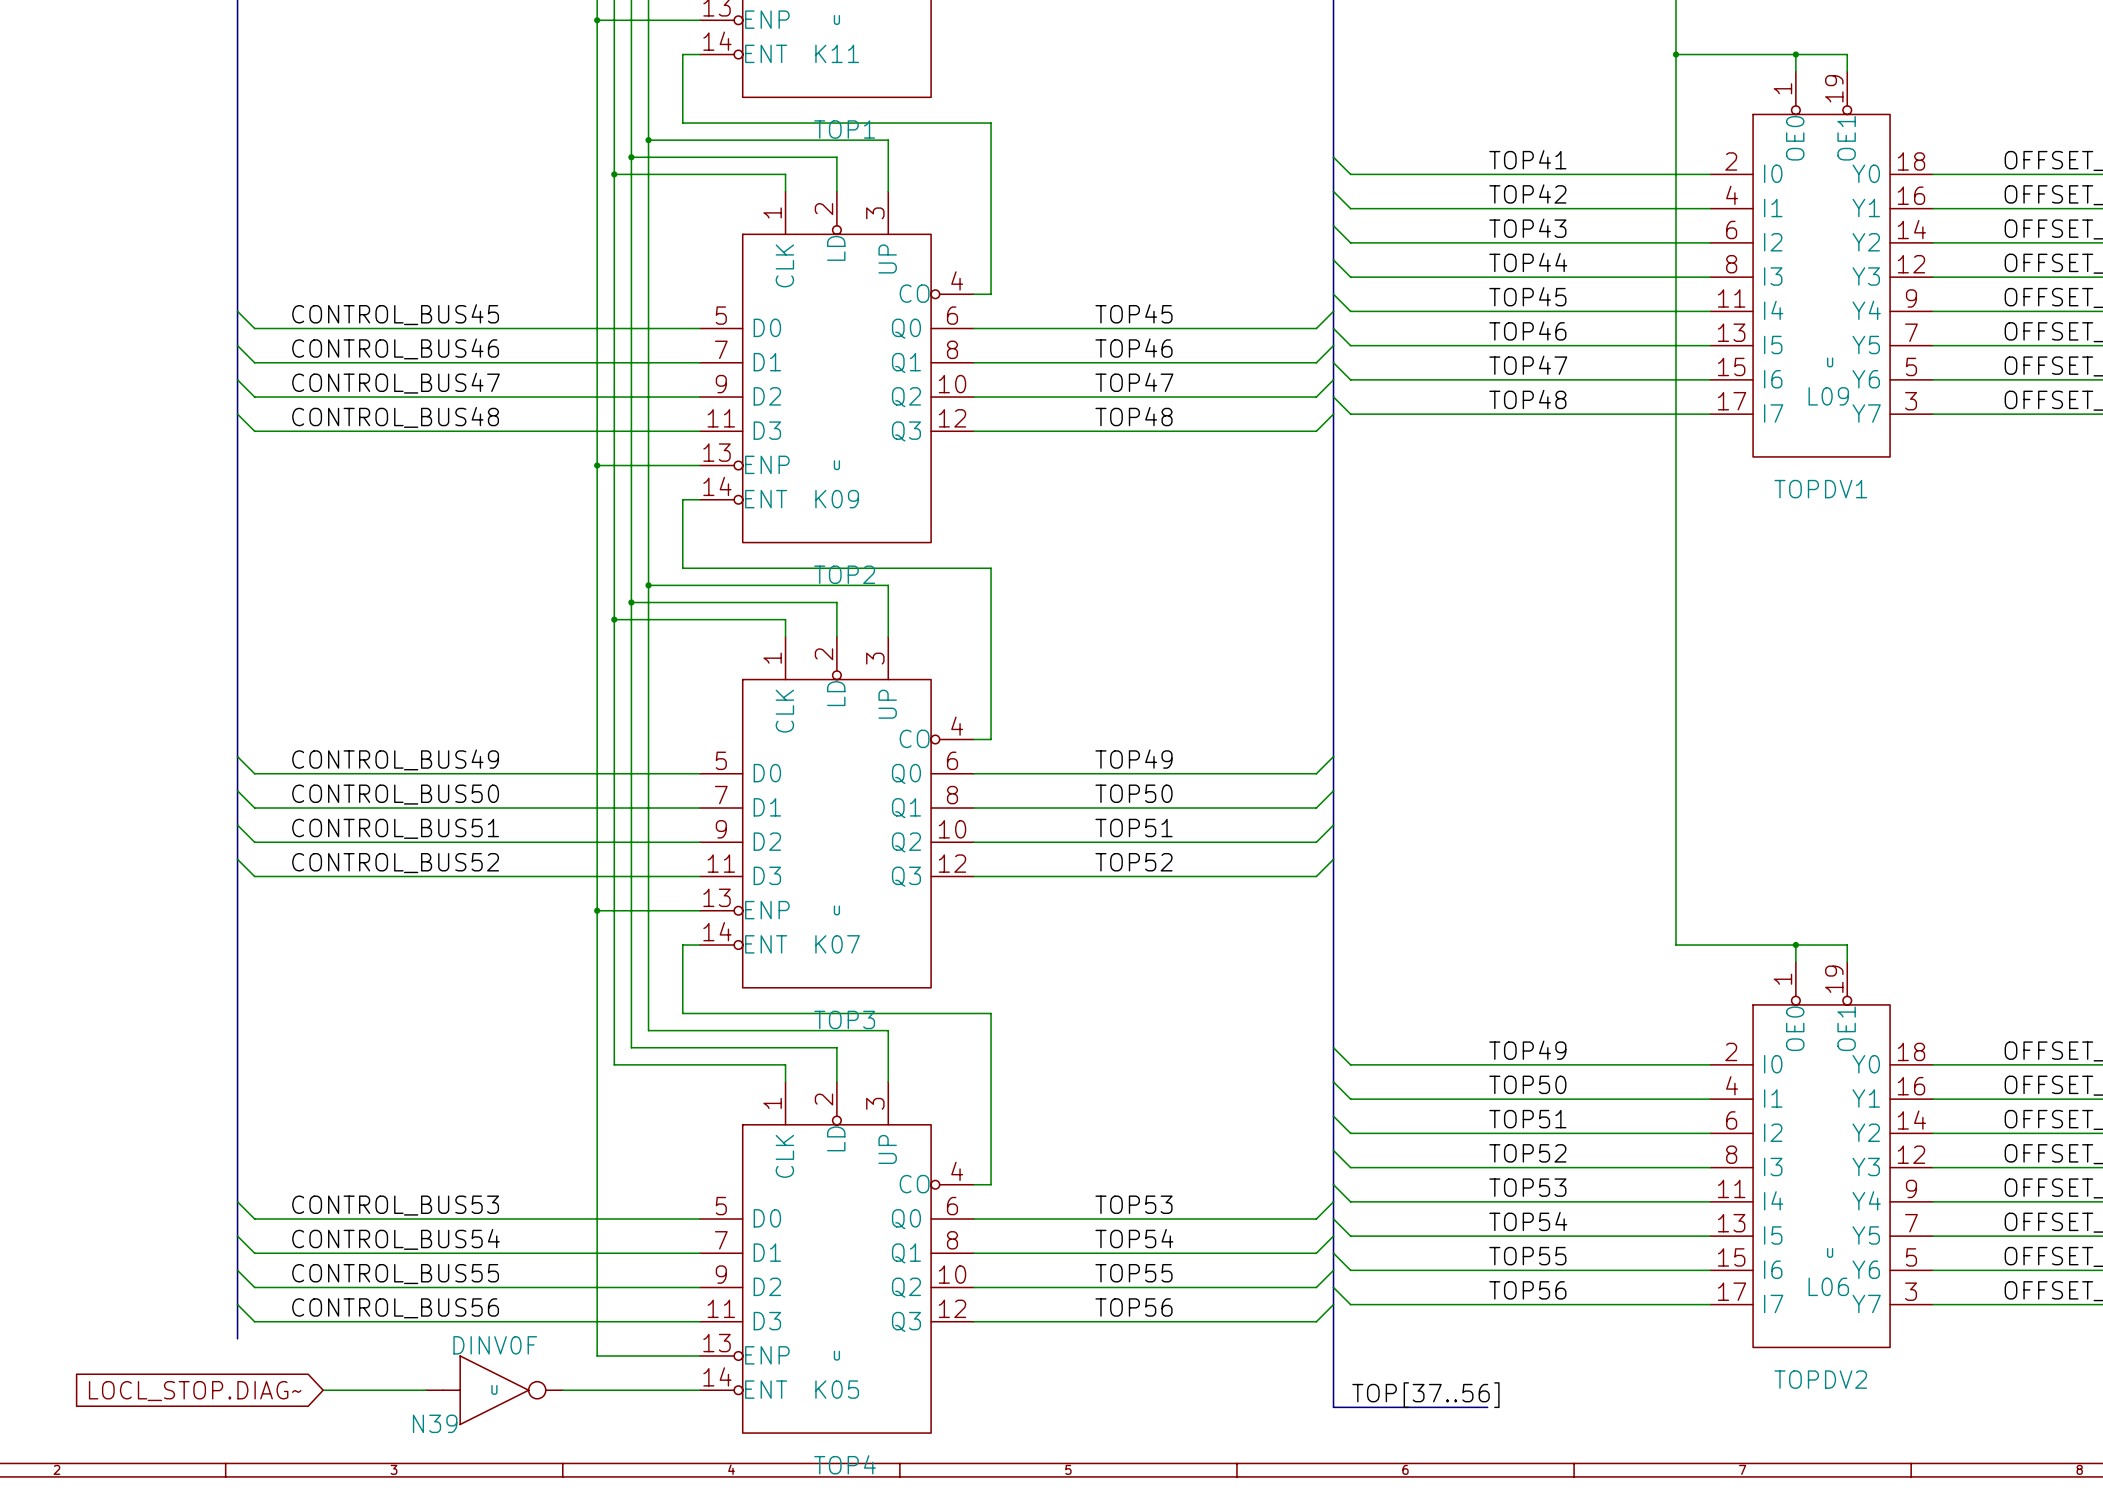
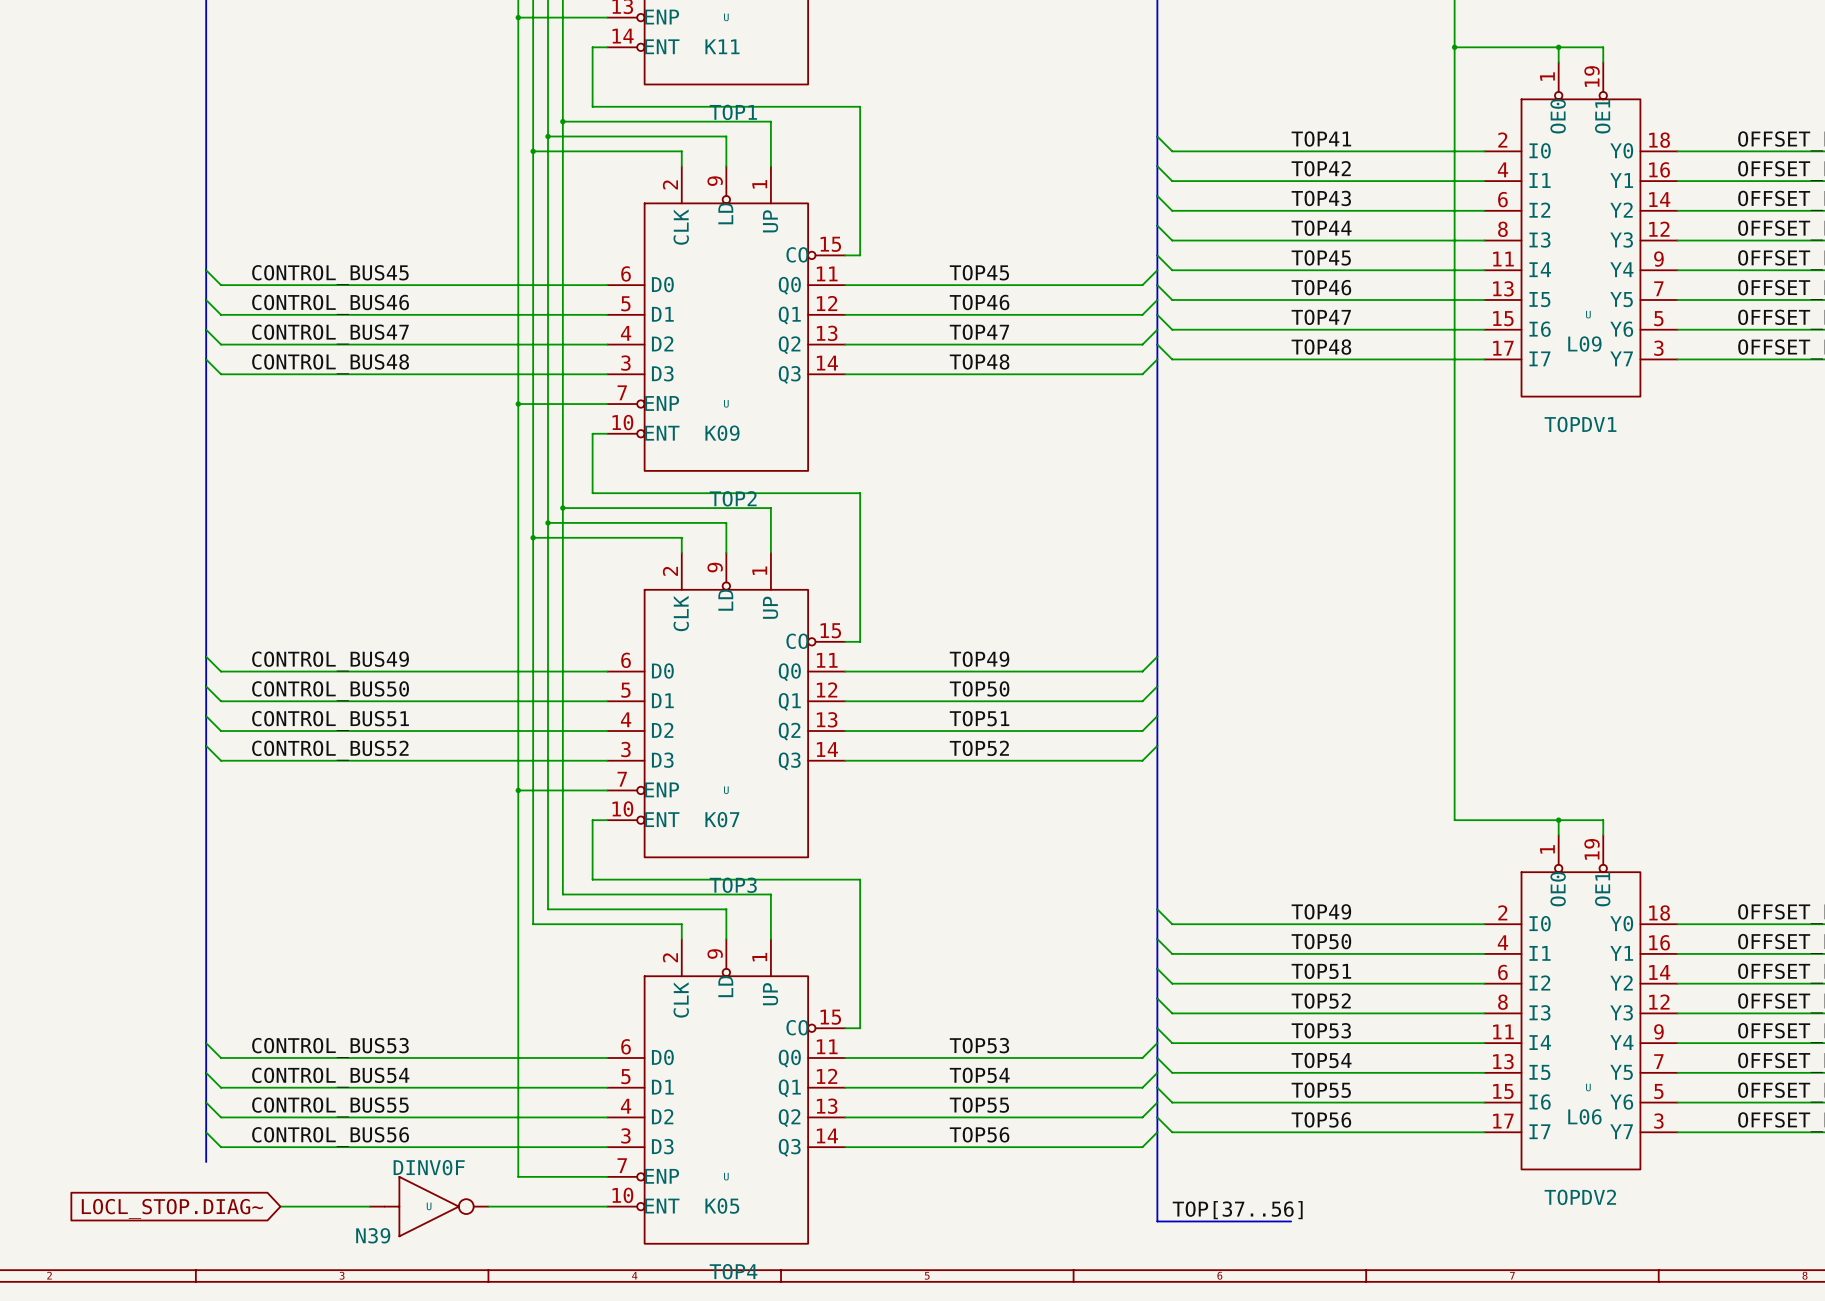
U symbol: [699, 191, 974, 543] -> [607, 166, 846, 471]
U symbol: [699, 636, 974, 988] -> [607, 552, 846, 858]
U symbol: [699, 1081, 974, 1434] -> [607, 939, 846, 1244]

